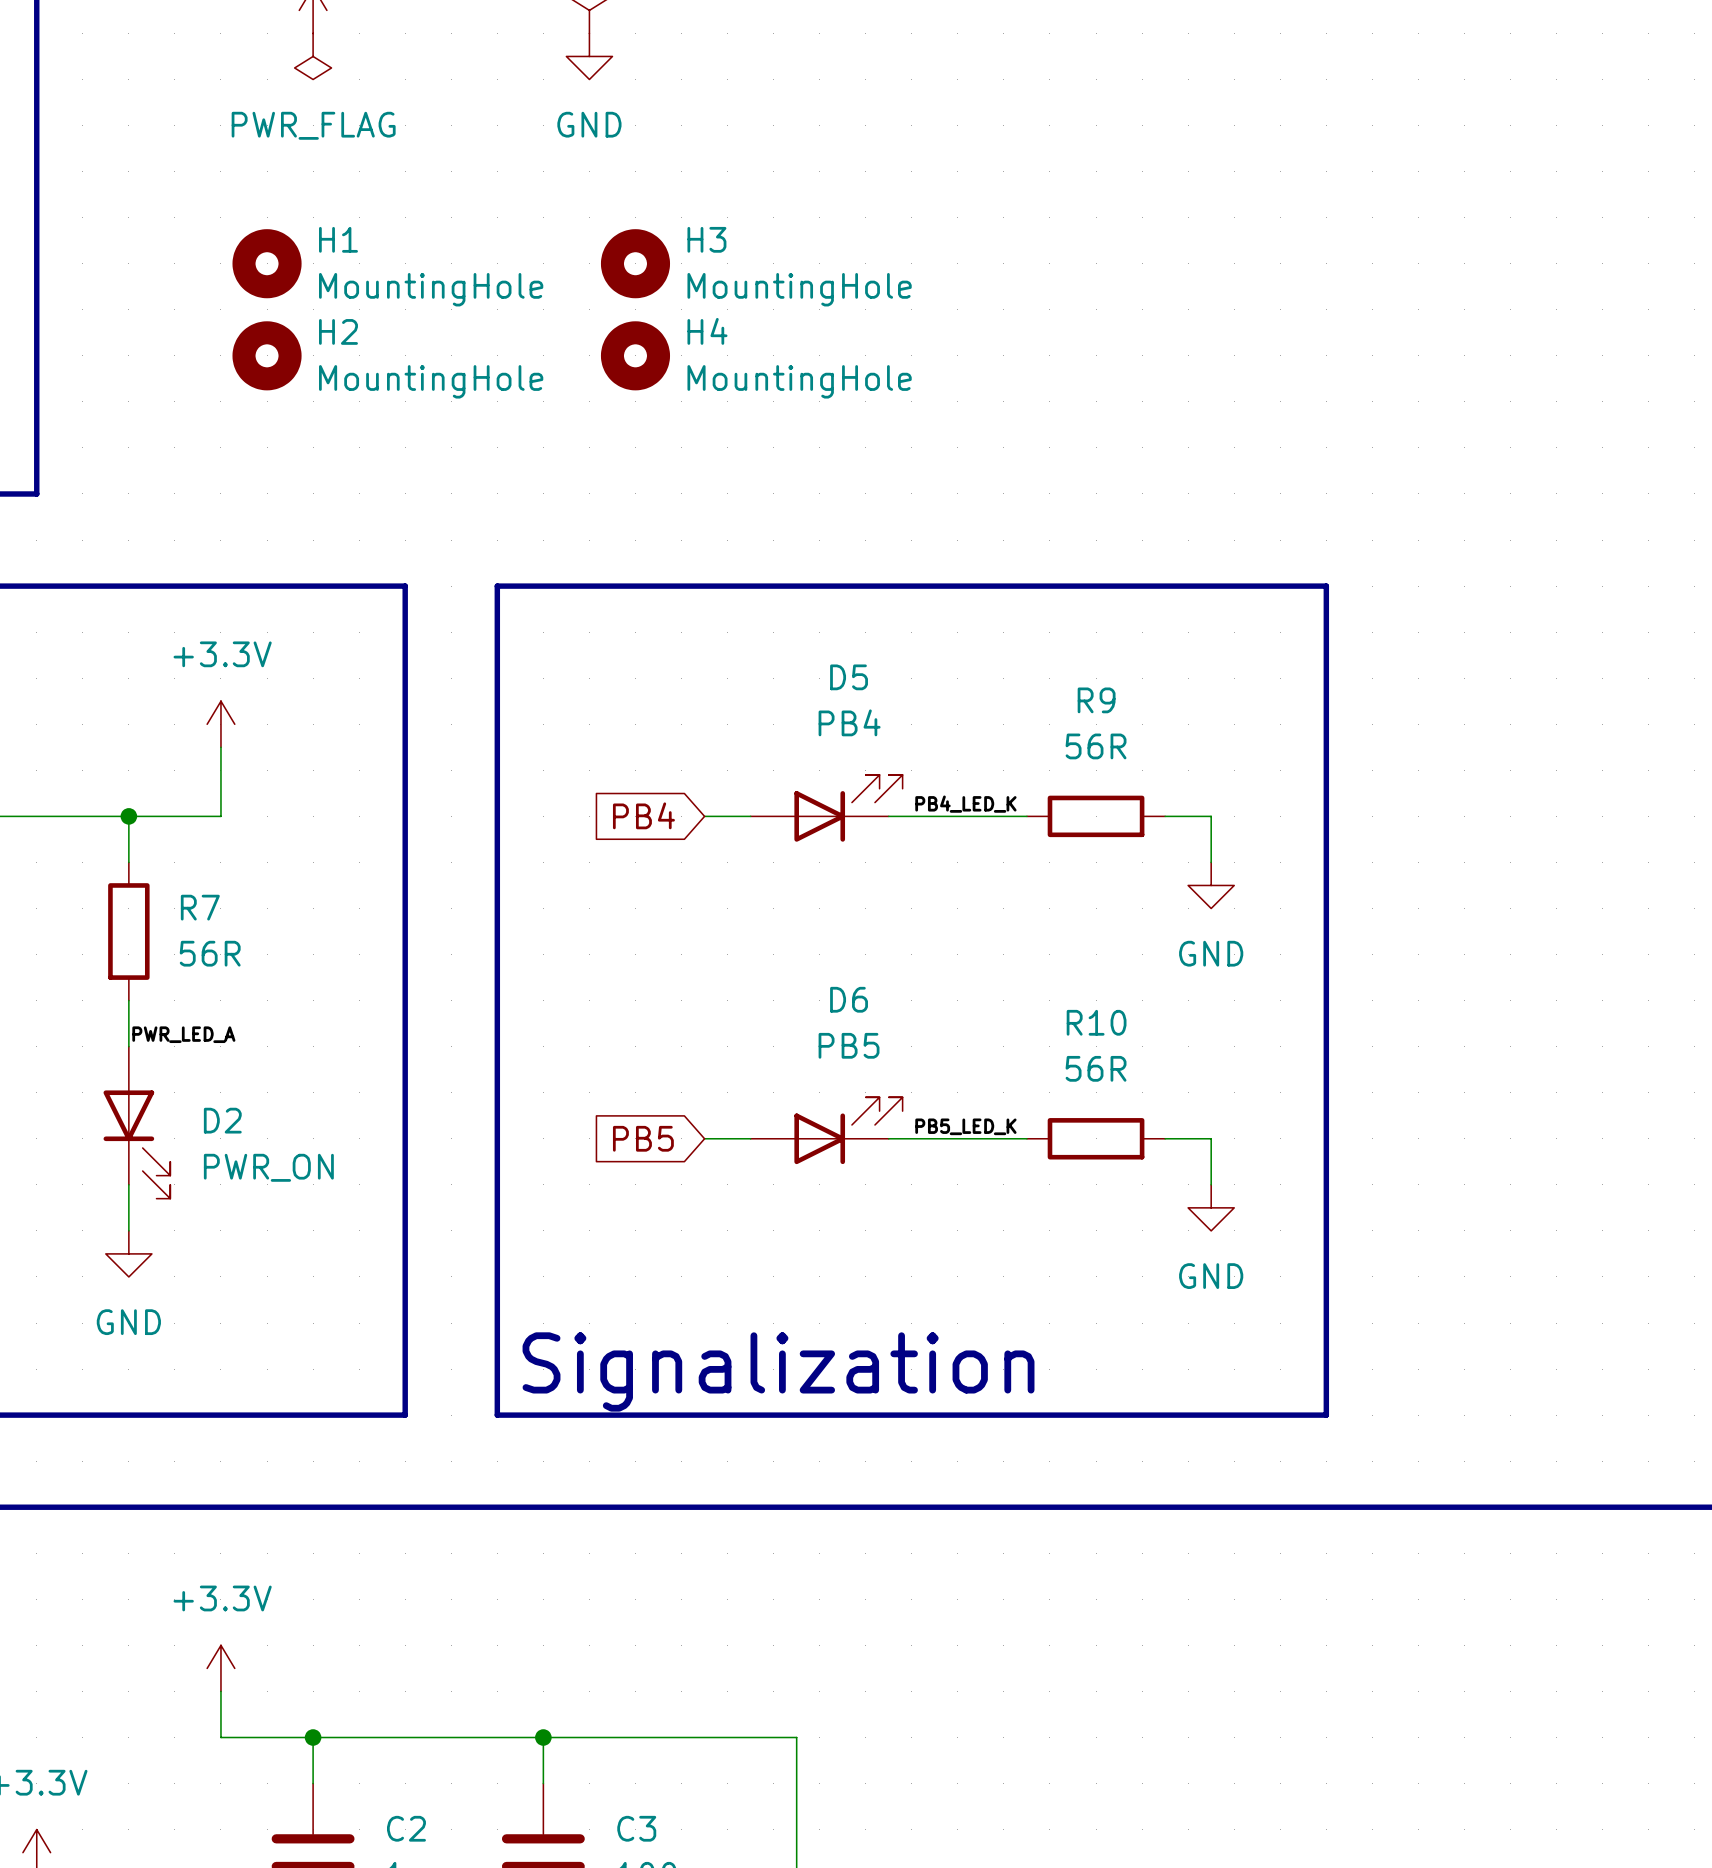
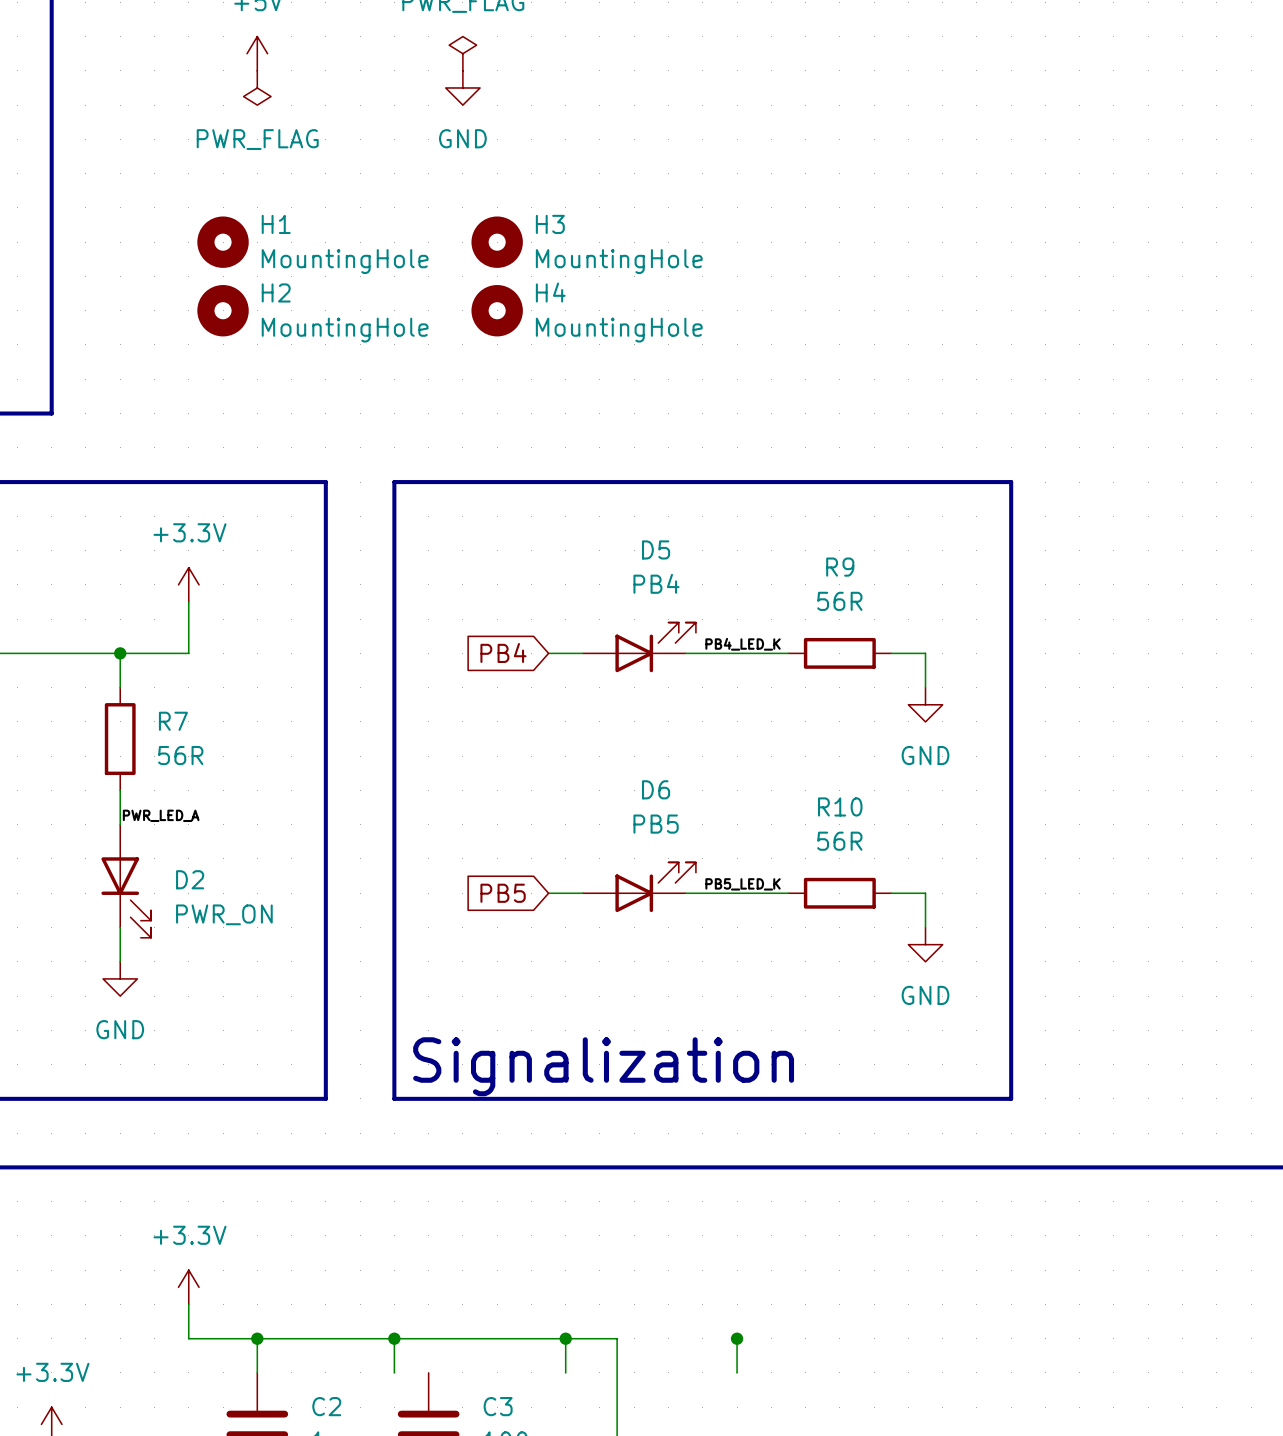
wire: (543, 1737) (543, 1783) -> (394, 1338) (394, 1372)
junction position: (543, 1737) -> (394, 1338)
wire: none -> (565, 1338) (565, 1372)
junction: none -> (565, 1338)
wire: none -> (737, 1338) (737, 1372)
junction: none -> (737, 1338)

